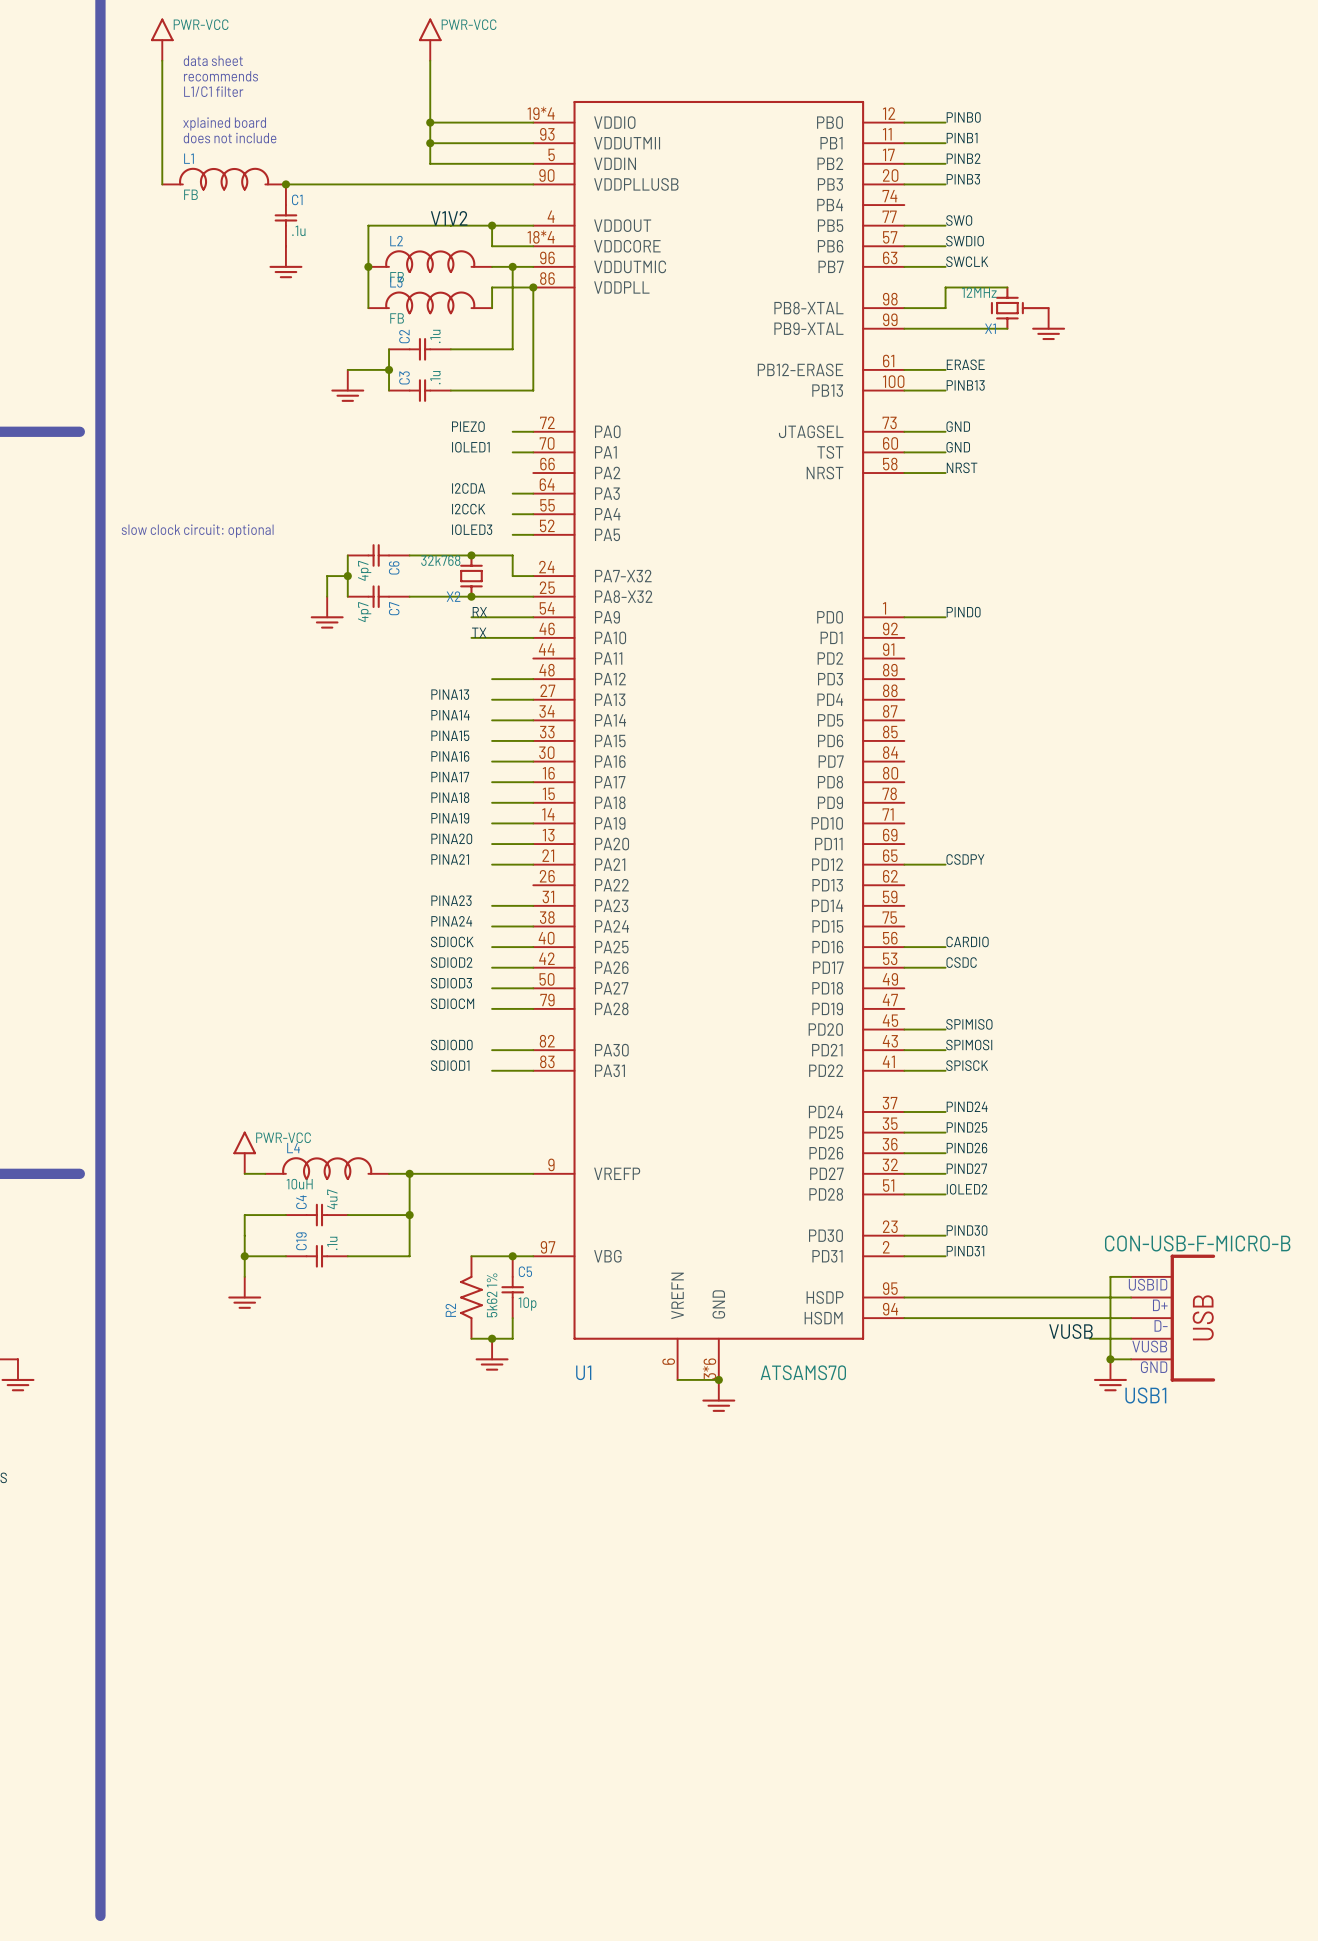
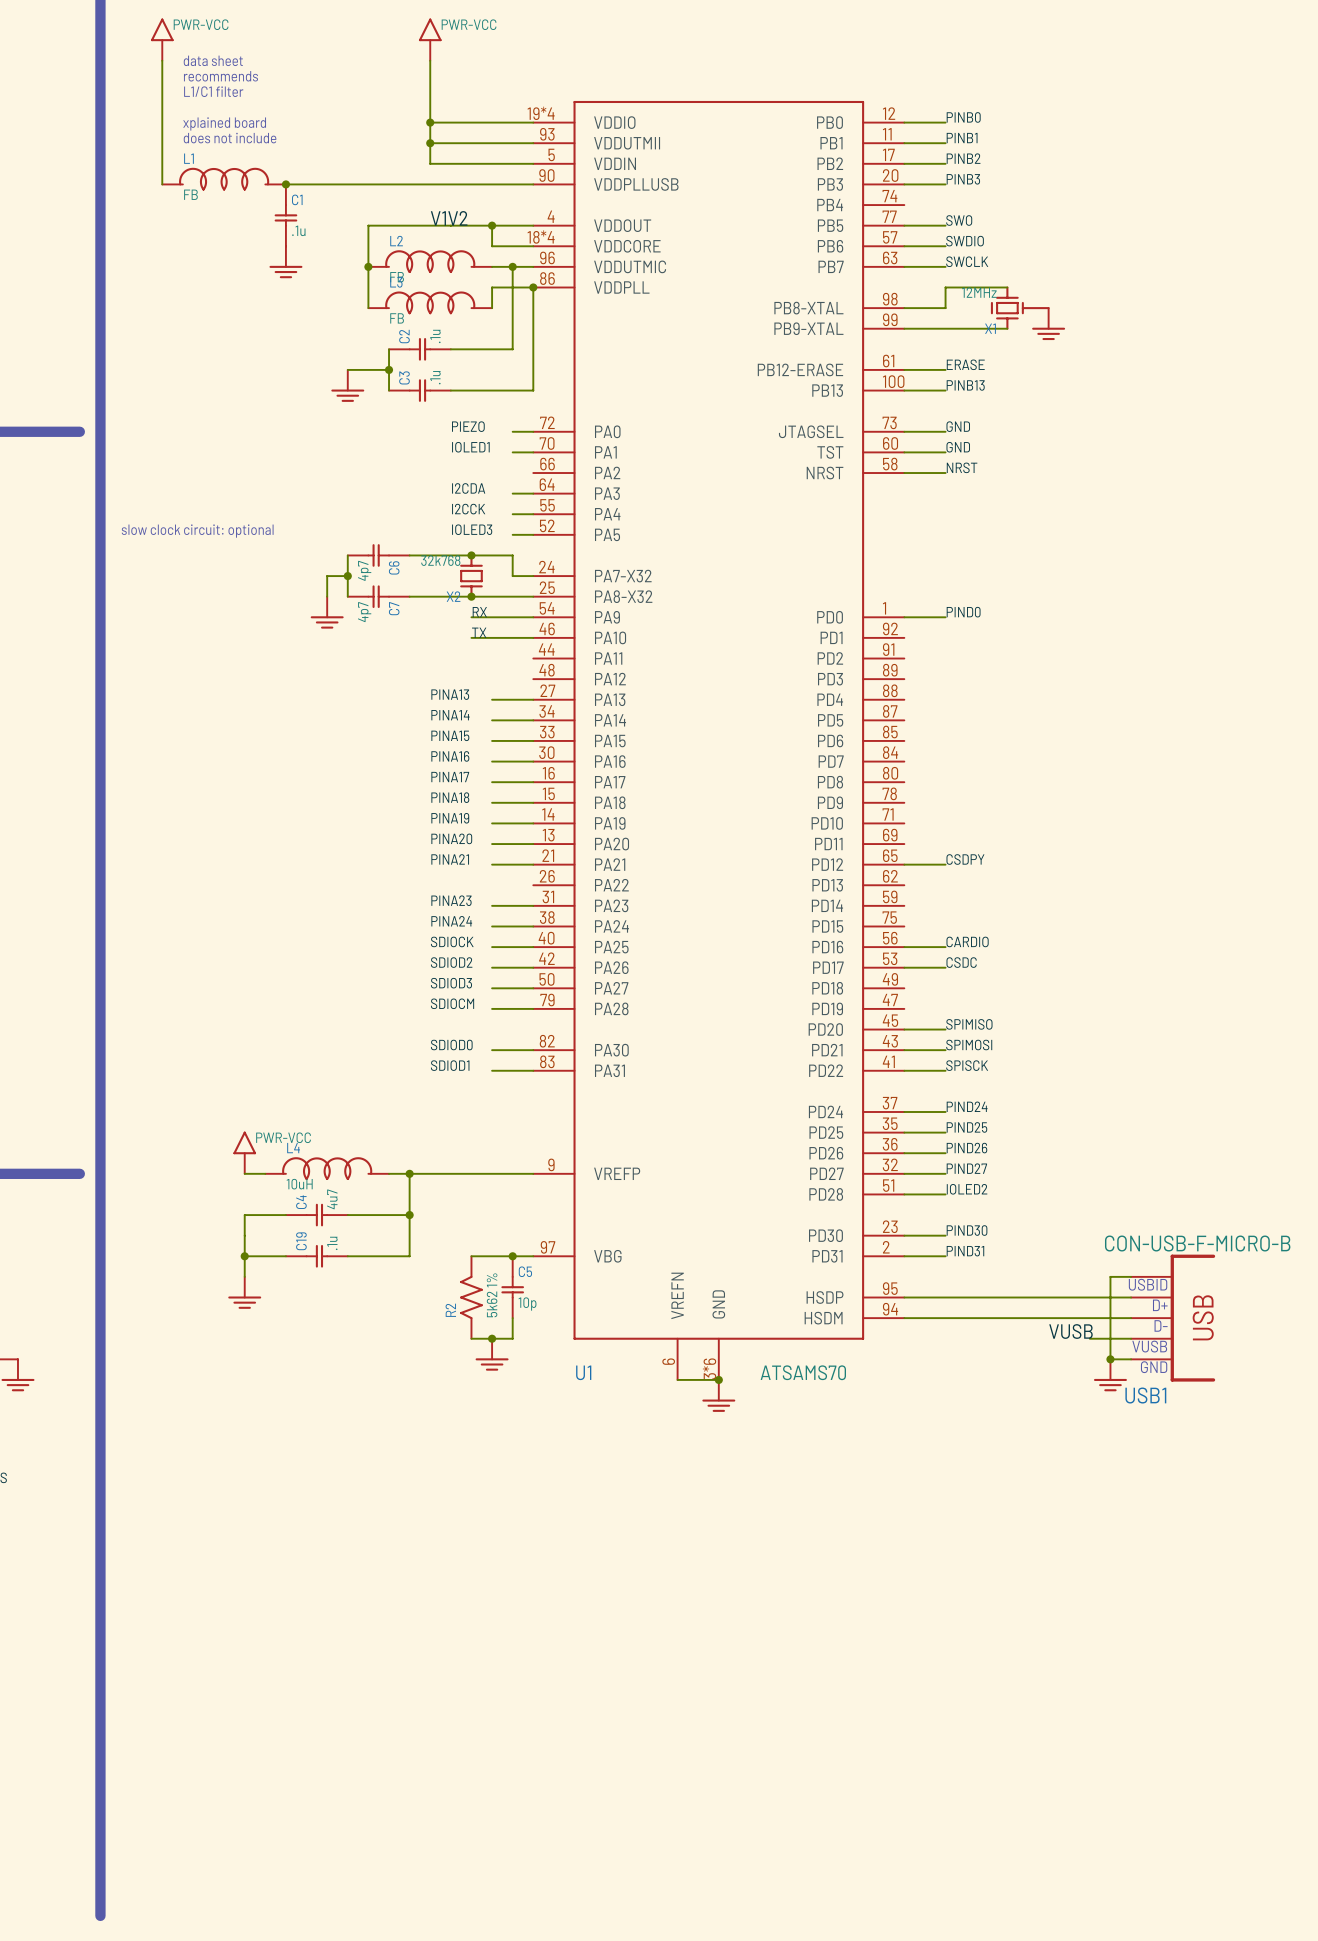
wire: (492, 679) (533, 679) -> none

